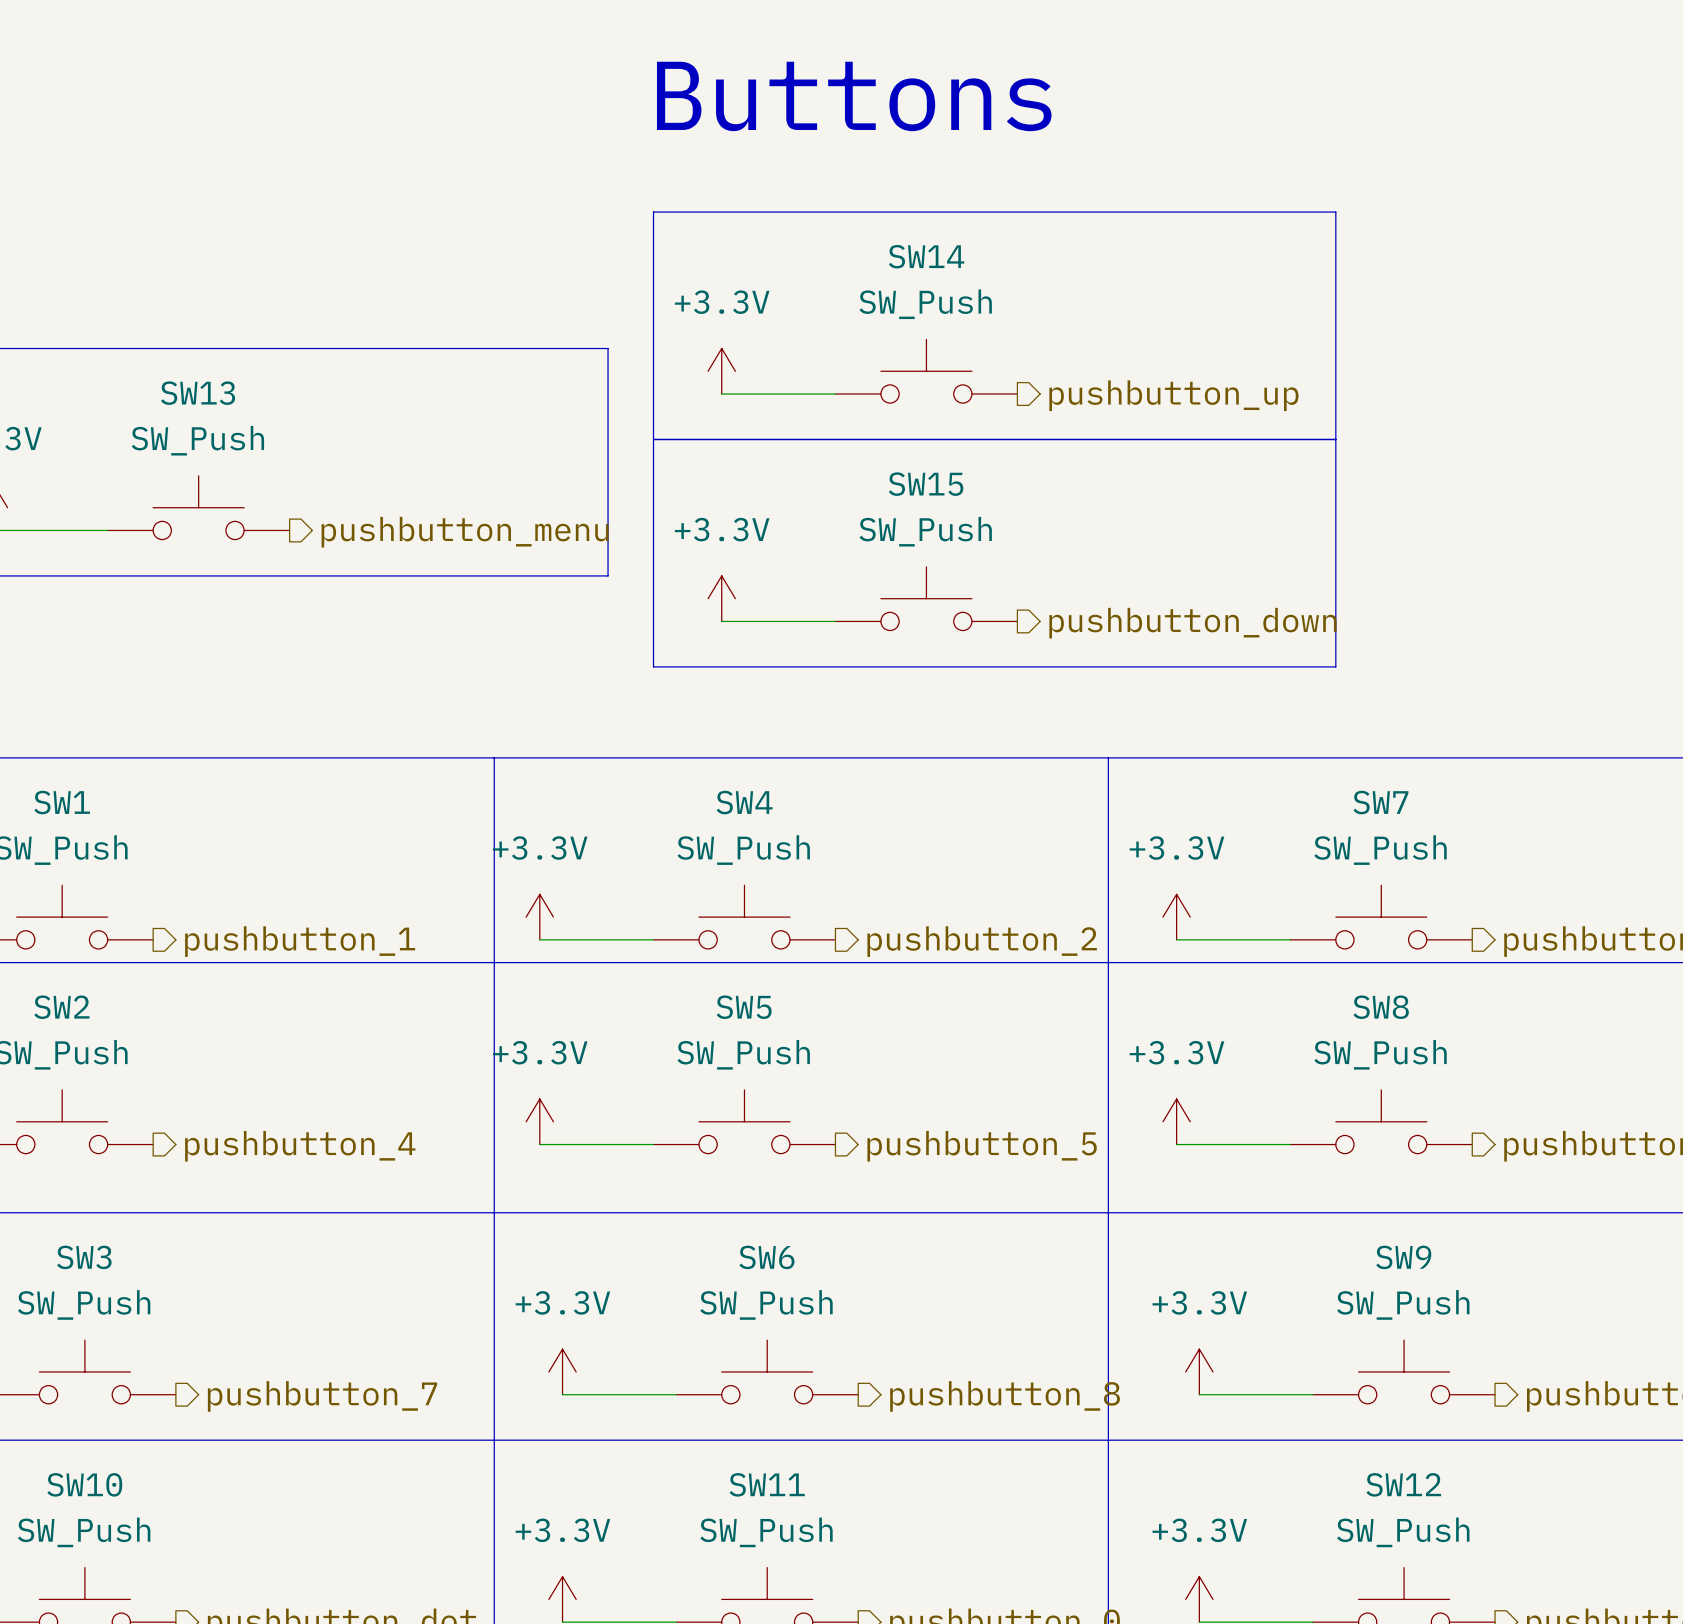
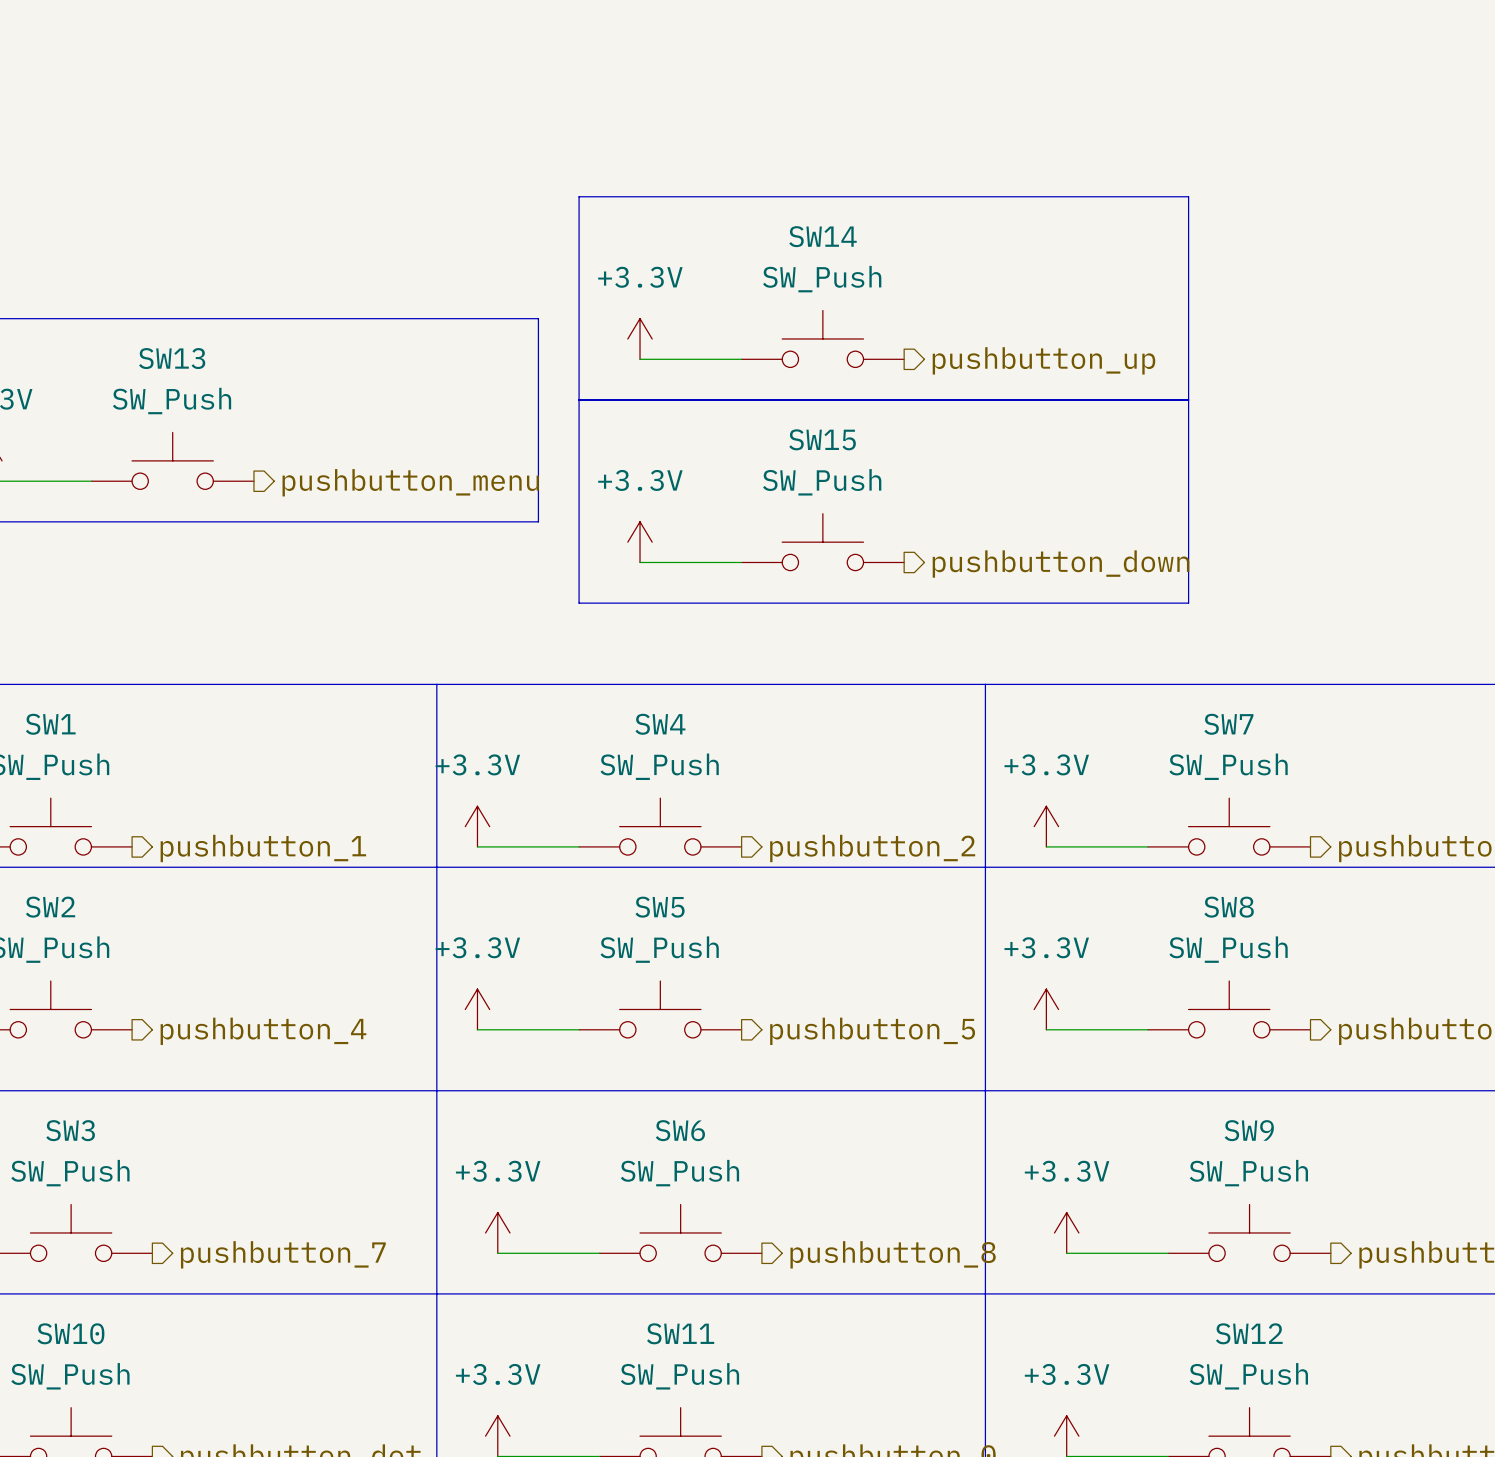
text: Buttons (854, 96) -> none

